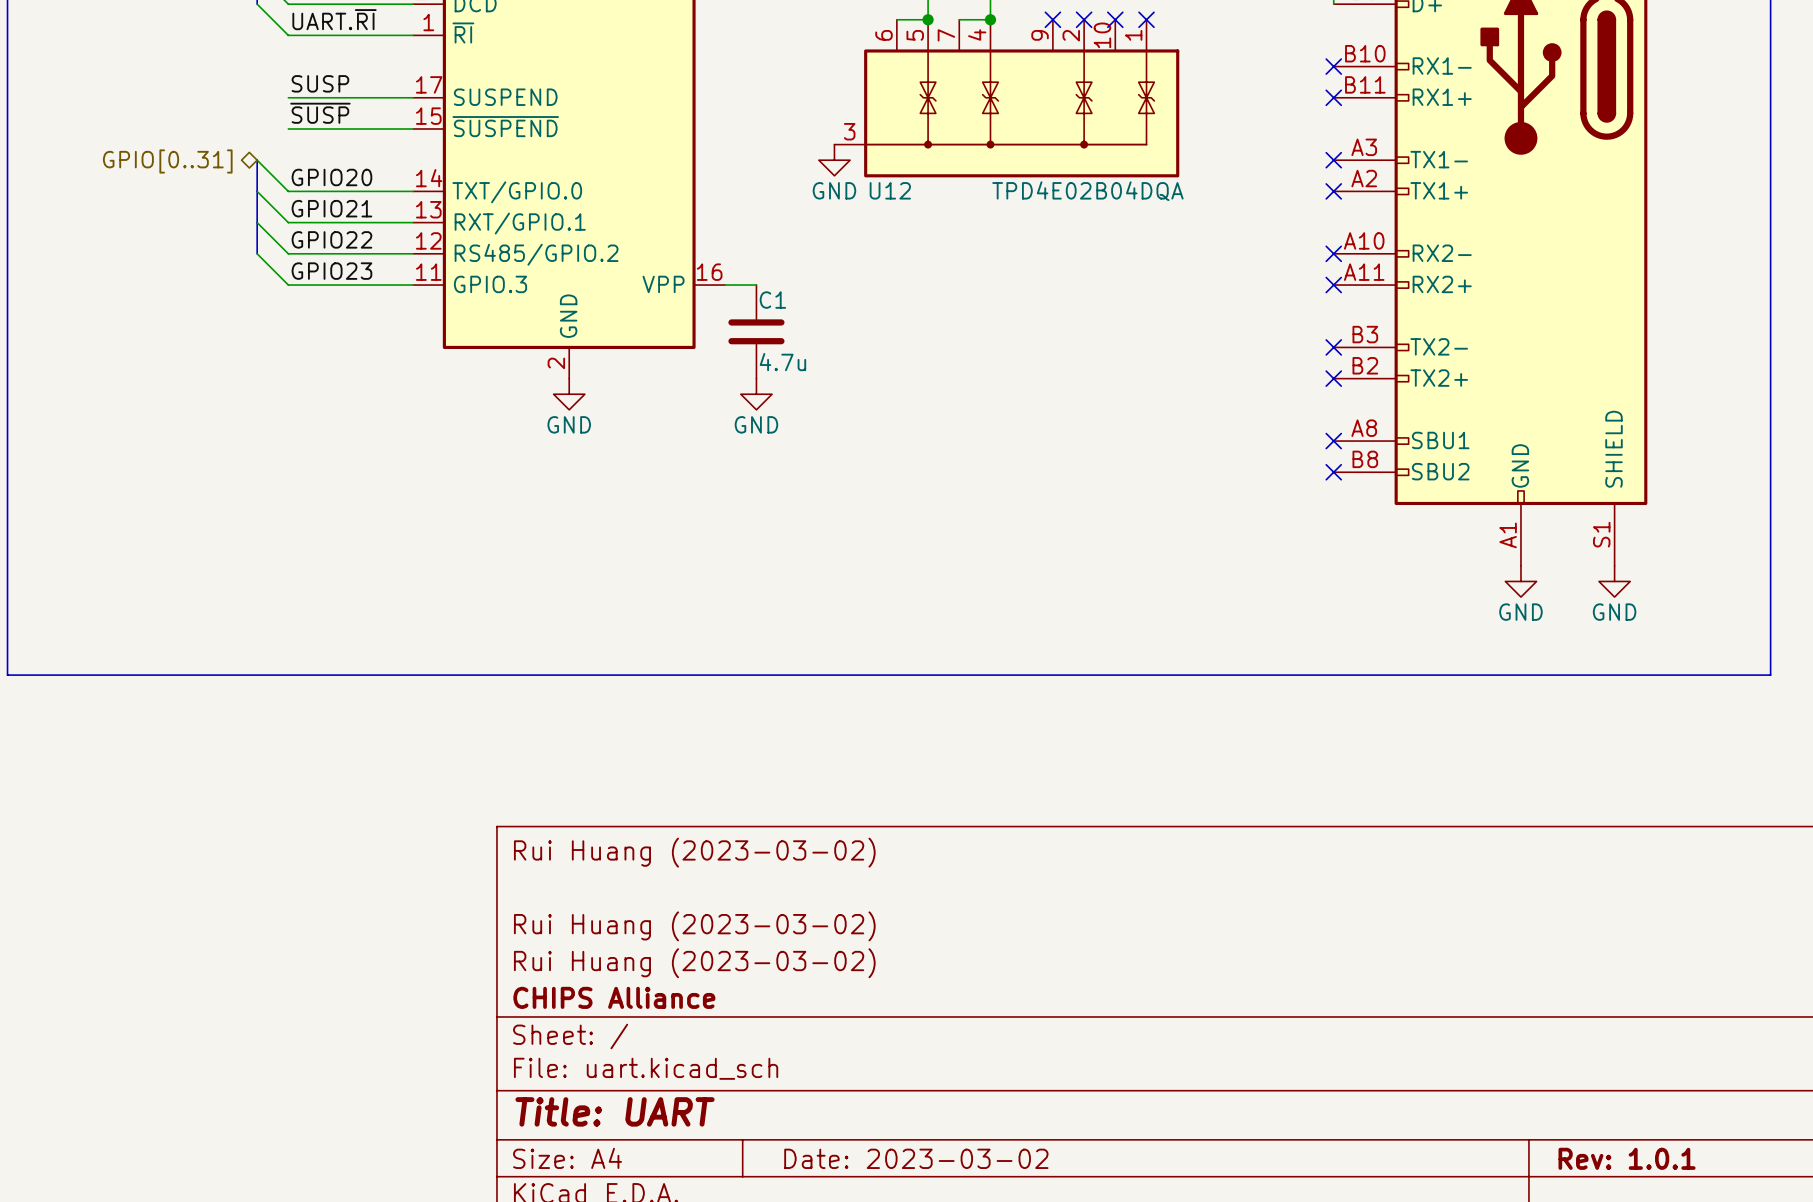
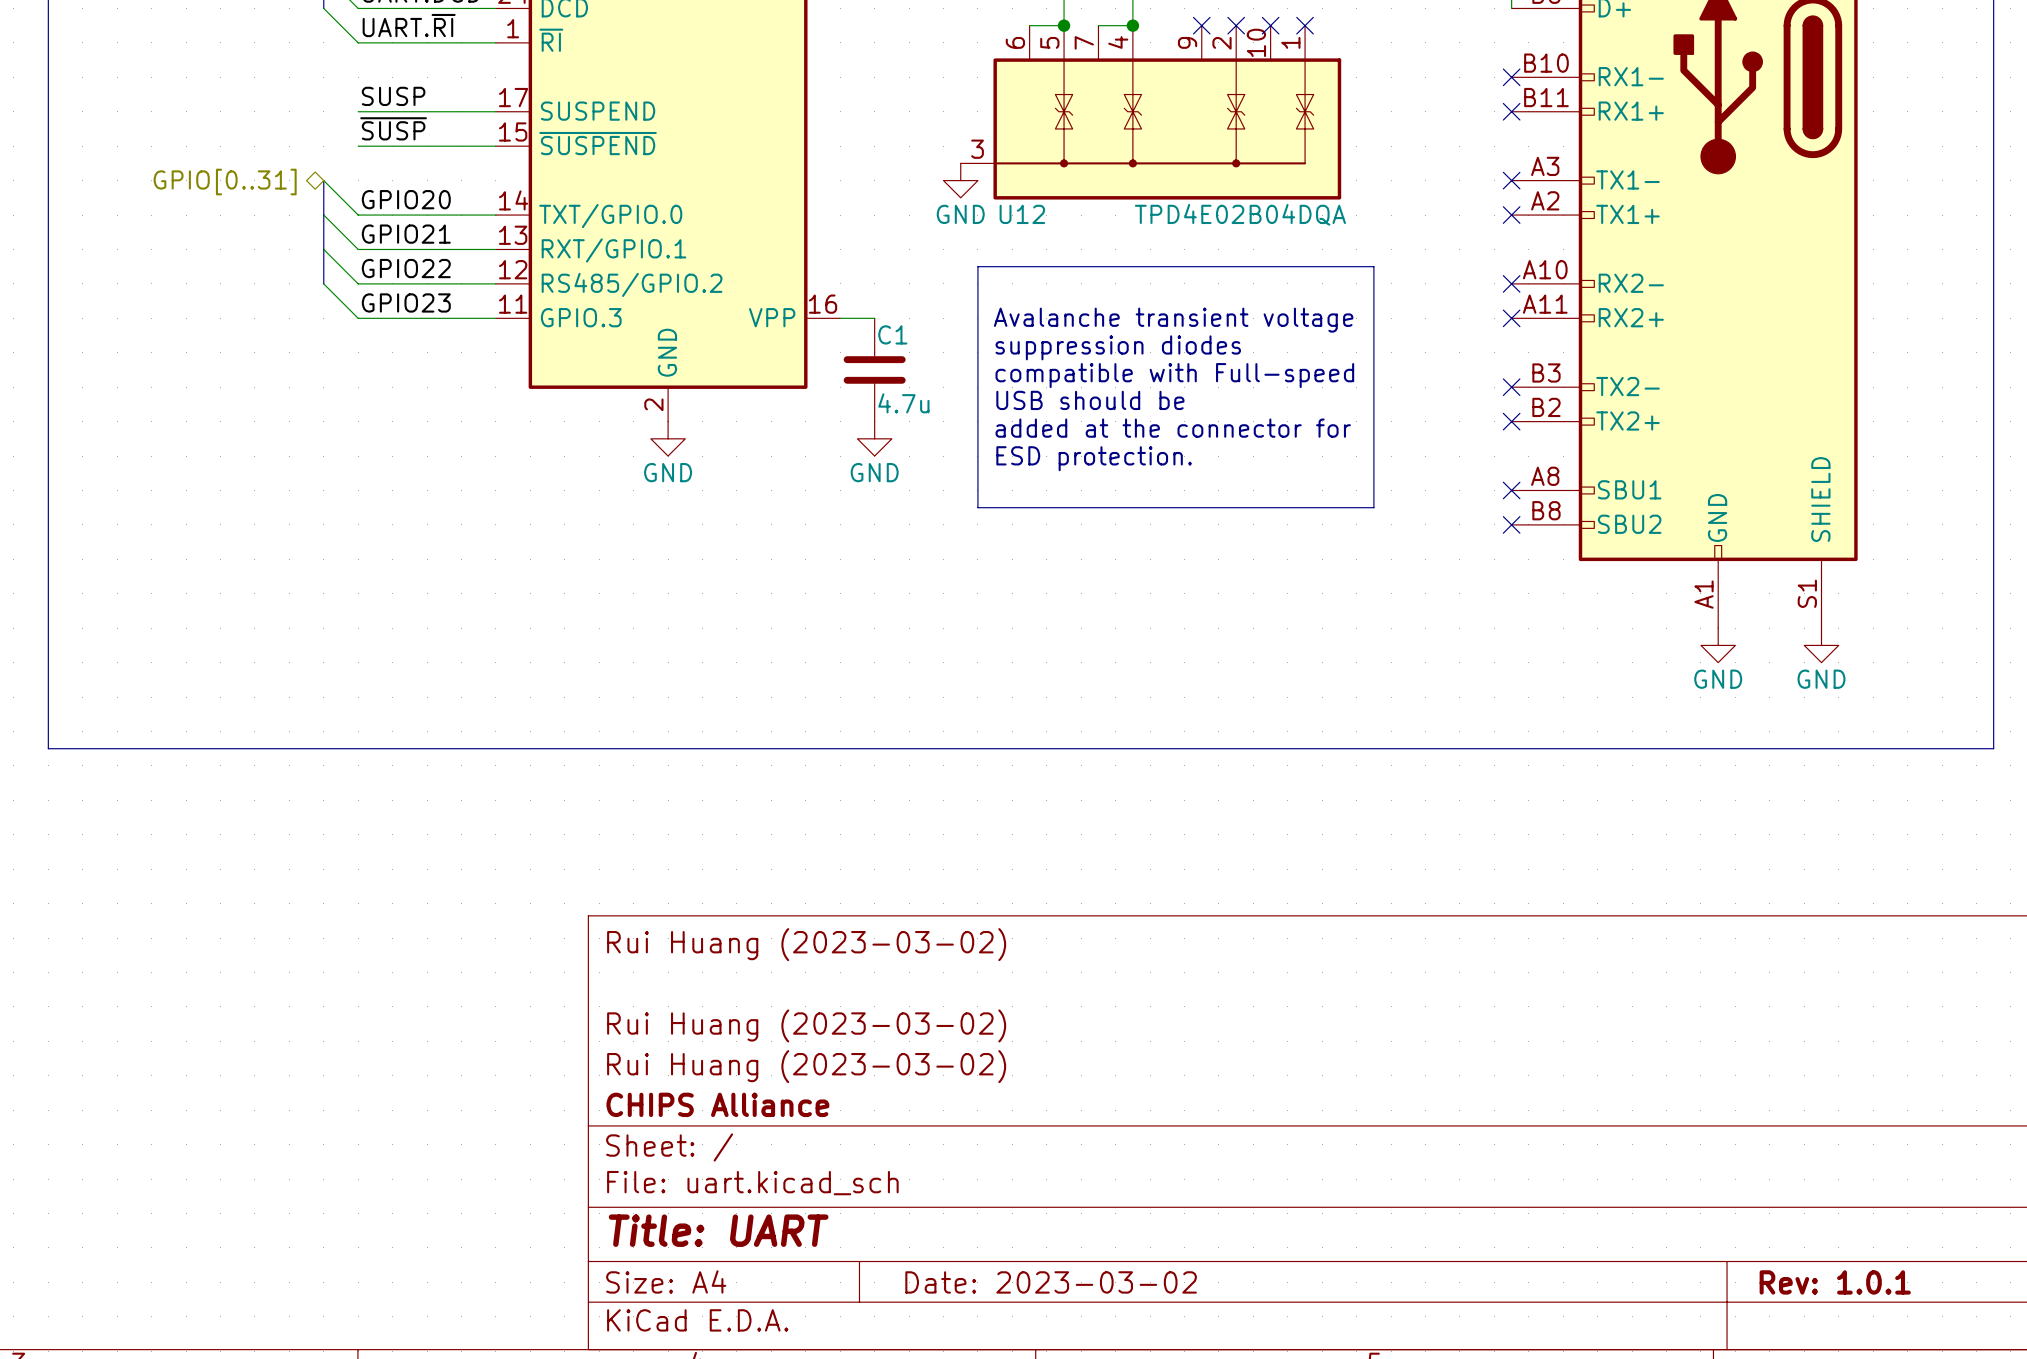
line: none -> (977, 266) (1373, 266) (1373, 507) (977, 507) (977, 266)
text: none -> Avalanche transient voltage (1173, 320)
text: none -> suppression diodes (1118, 347)
text: none -> compatible with Full-speed (1174, 375)
text: none -> USB should be (1090, 400)
text: none -> added at the connector for (1173, 428)
text: none -> ESD protection. (1094, 458)

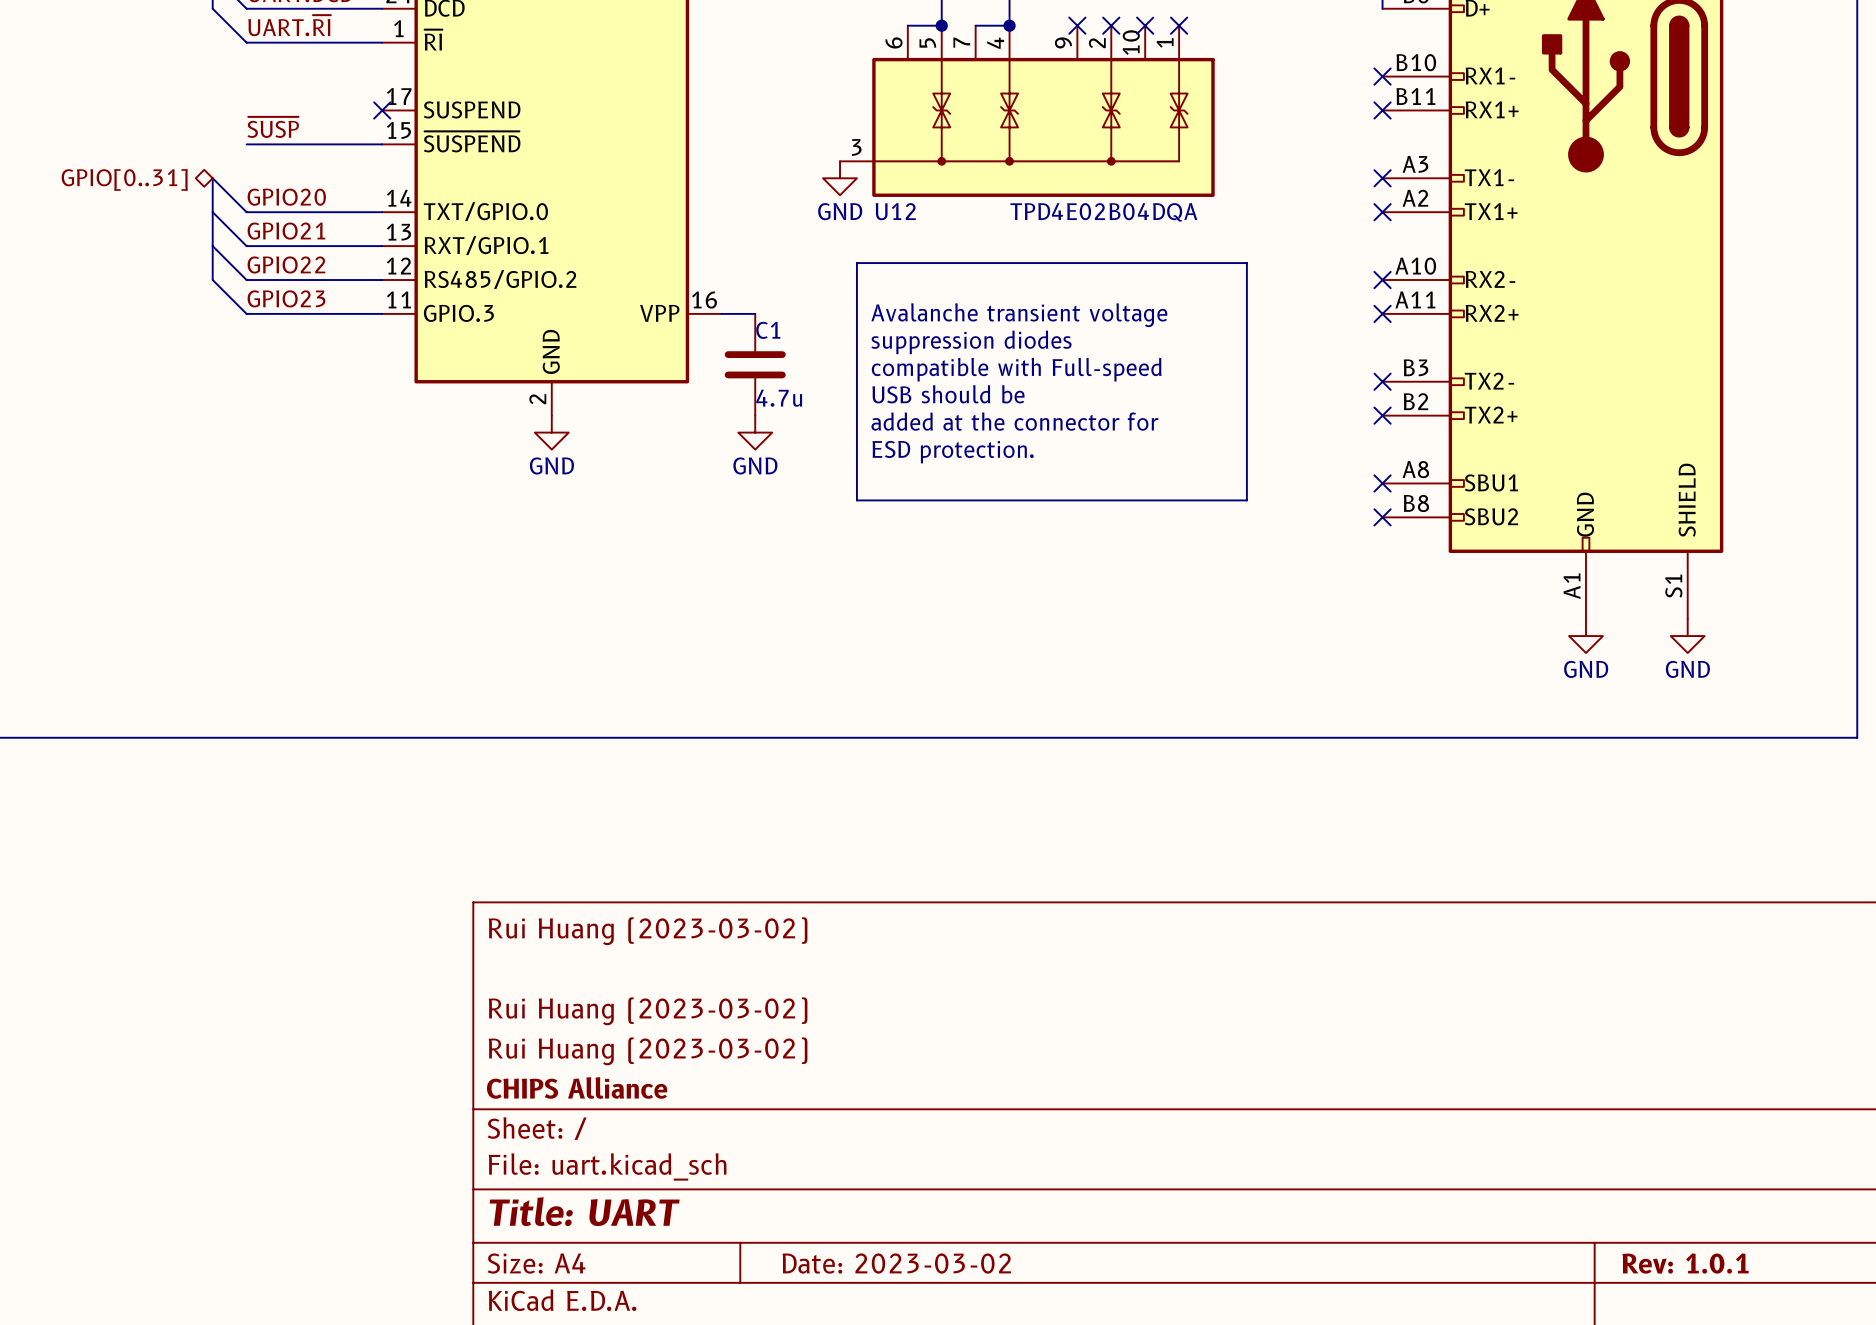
label: SUSP (393, 96) -> none
wire: (358, 111) (495, 111) -> none
no-connect mark: none -> (382, 110)

